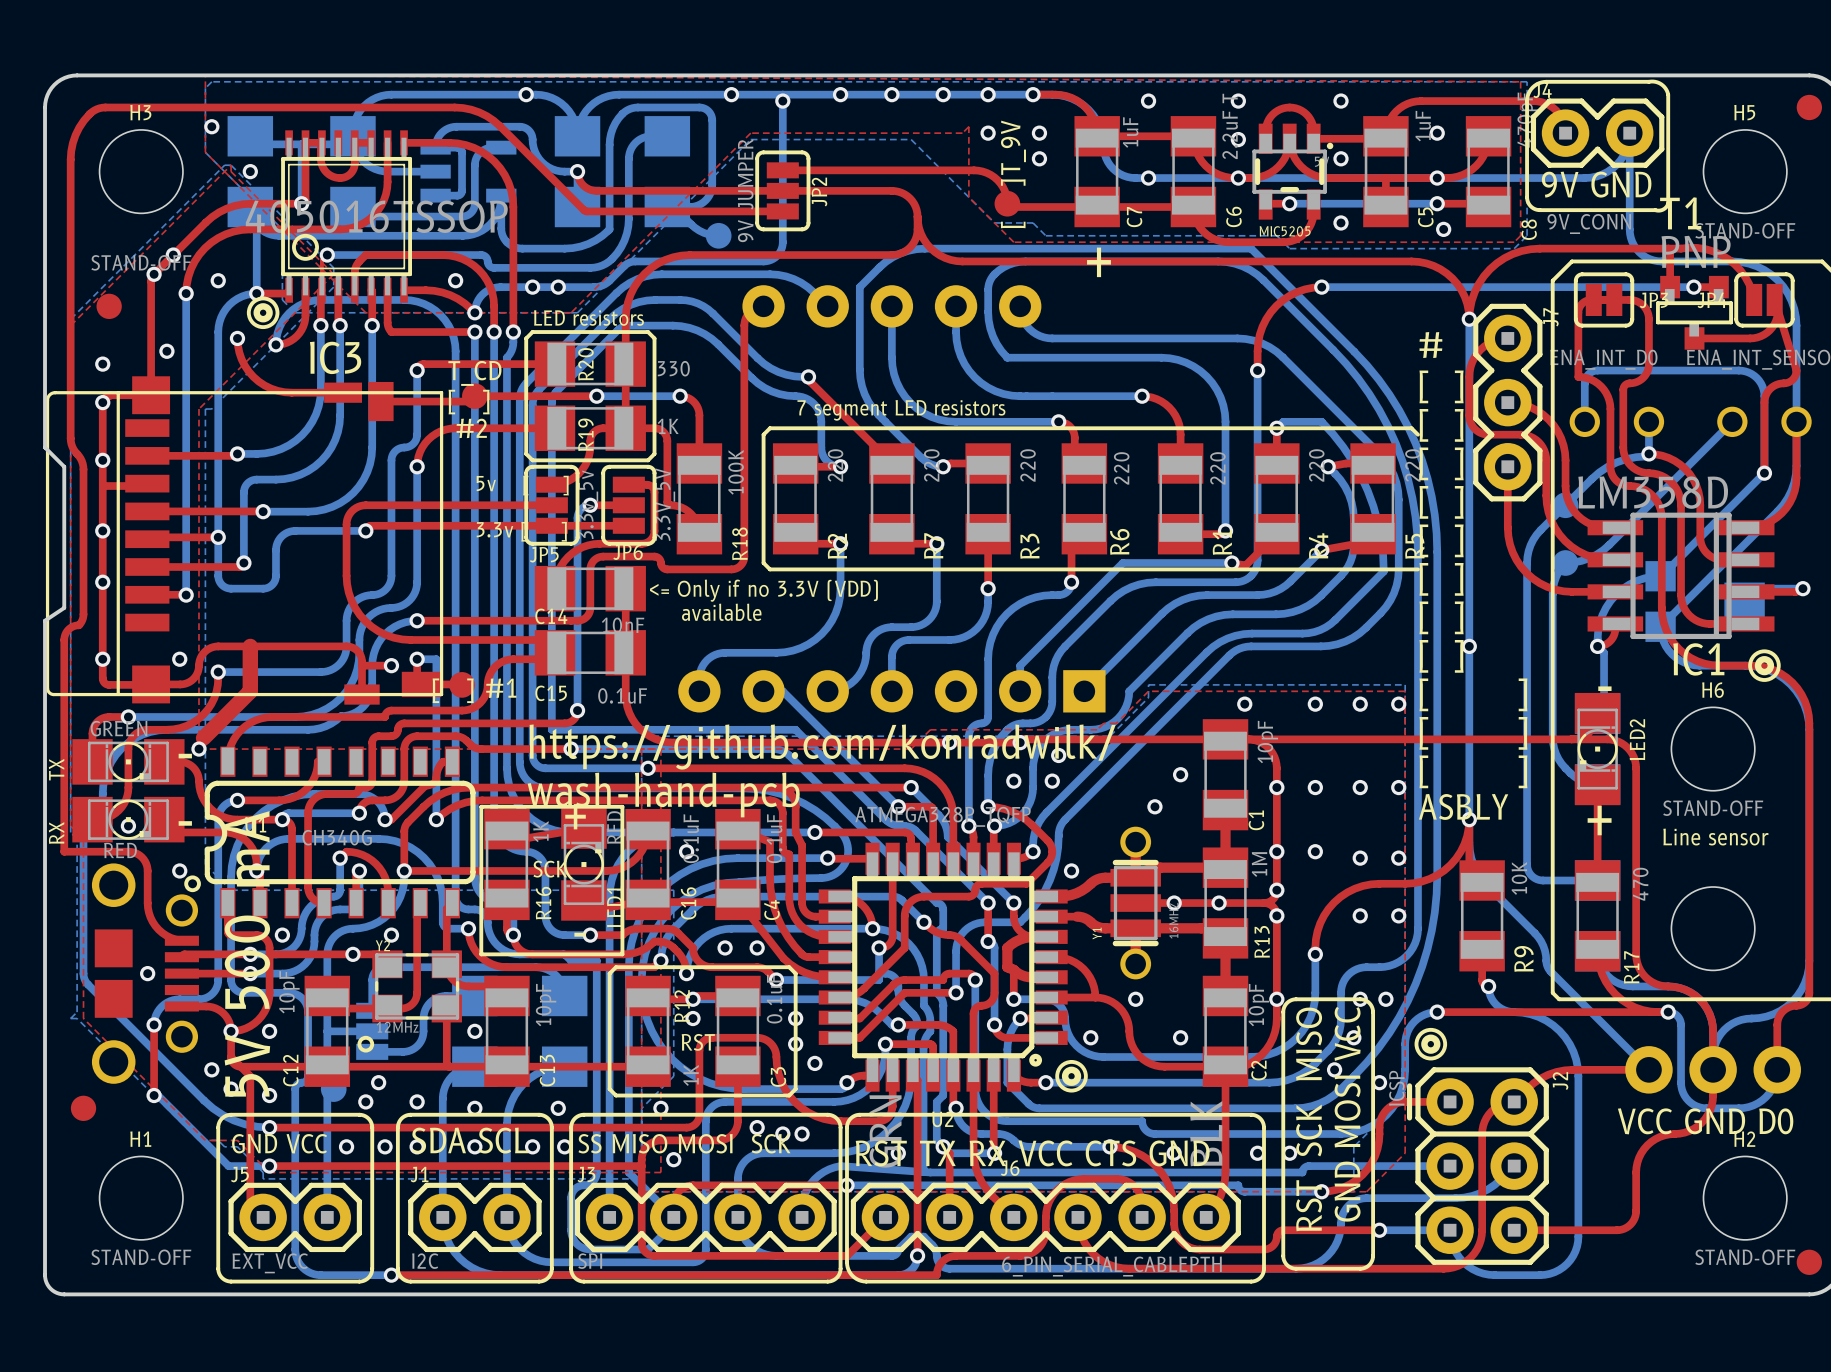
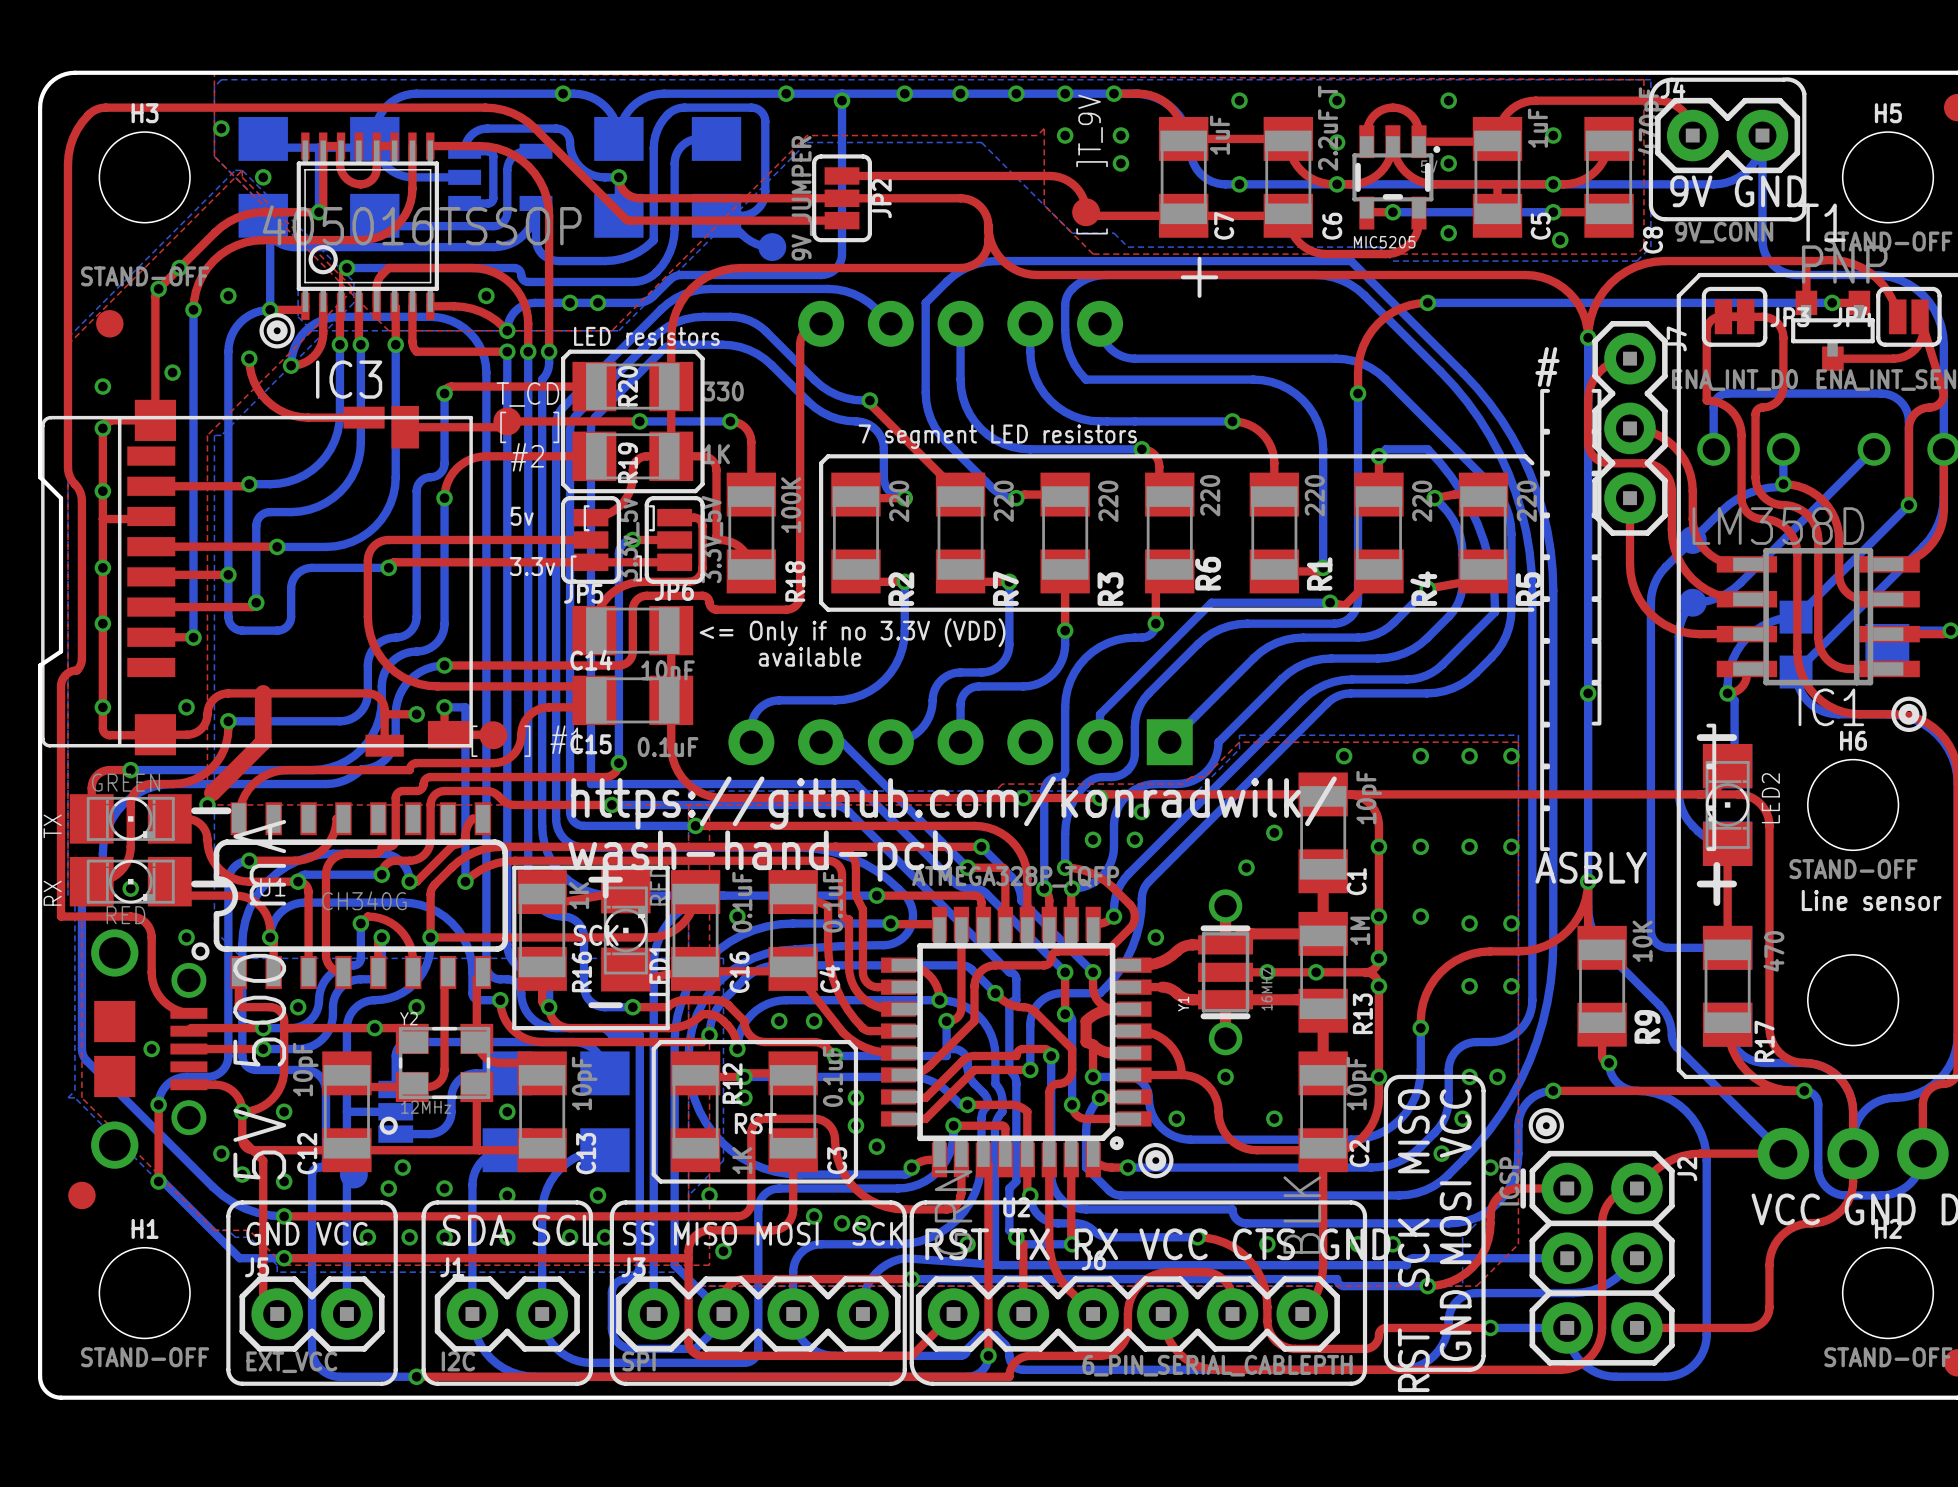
top track: (506, 1066) (648, 1066) -> none

